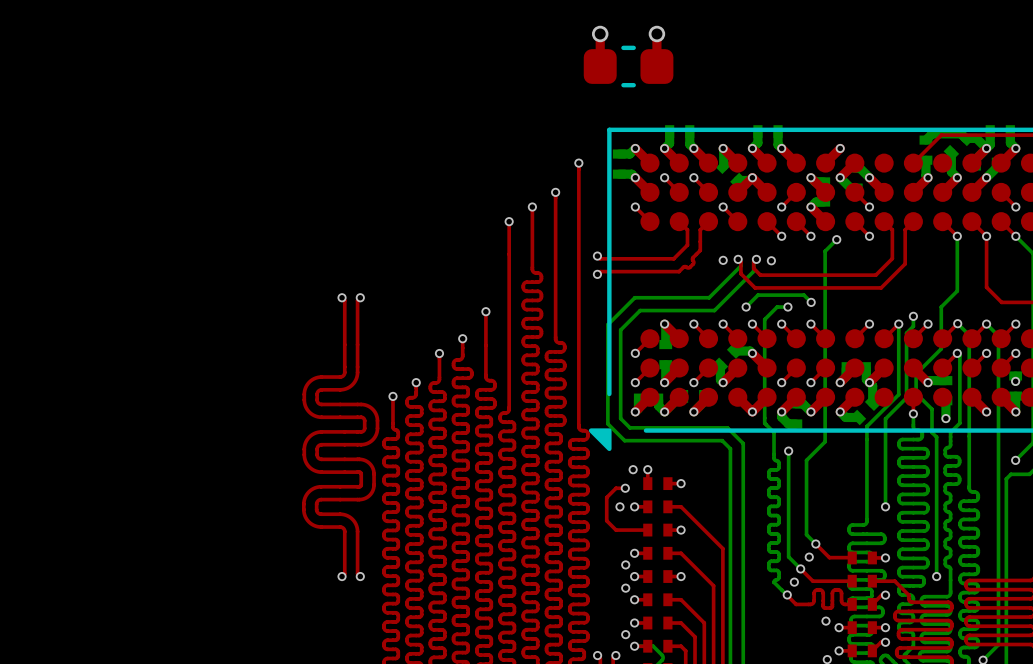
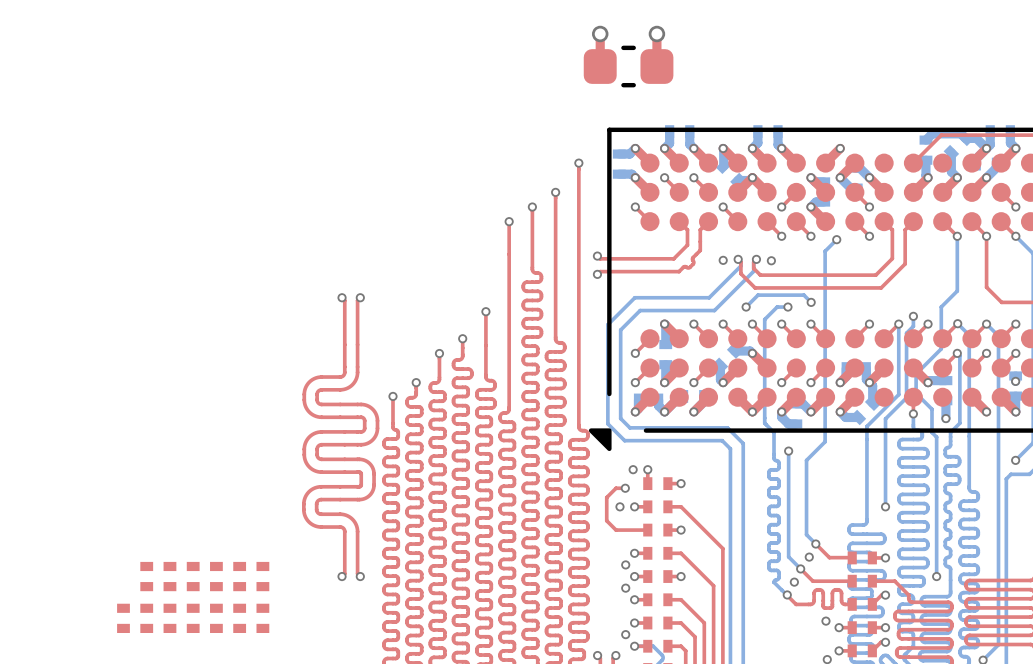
part: none -> (146, 576)
part: none -> (169, 576)
part: none -> (193, 576)
part: none -> (216, 576)
part: none -> (239, 576)
part: none -> (262, 576)
part: none -> (123, 618)
part: none -> (146, 618)
part: none -> (169, 618)
part: none -> (193, 618)
part: none -> (216, 618)
part: none -> (239, 618)
part: none -> (262, 618)

